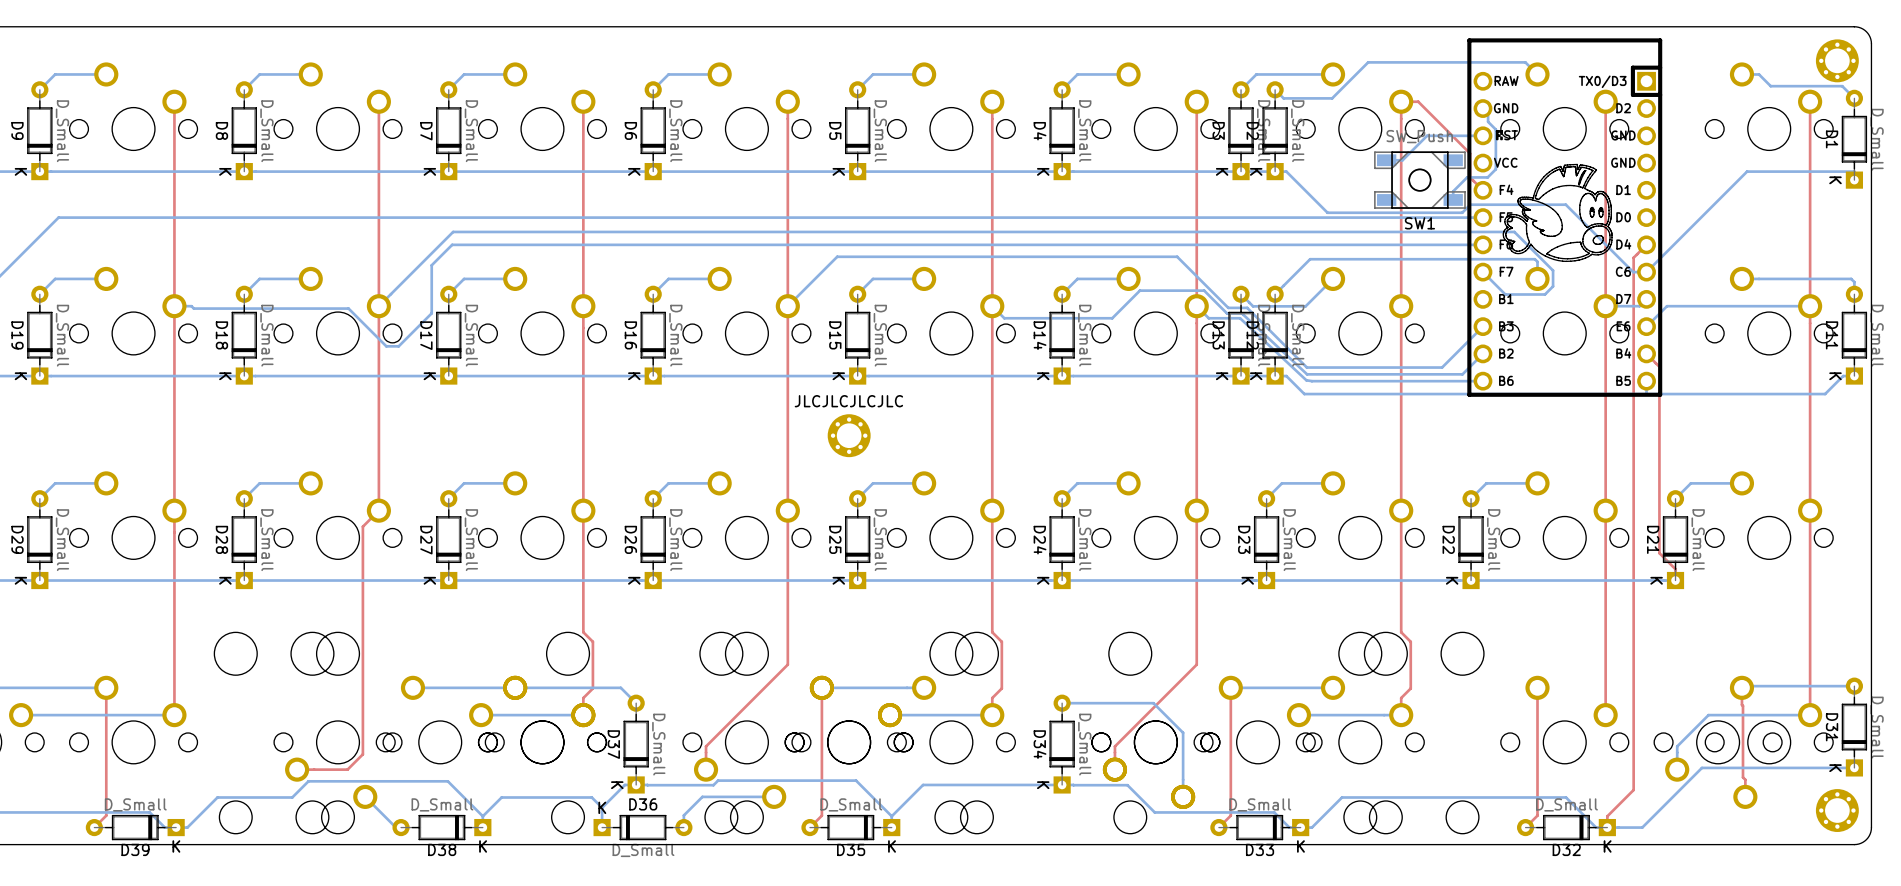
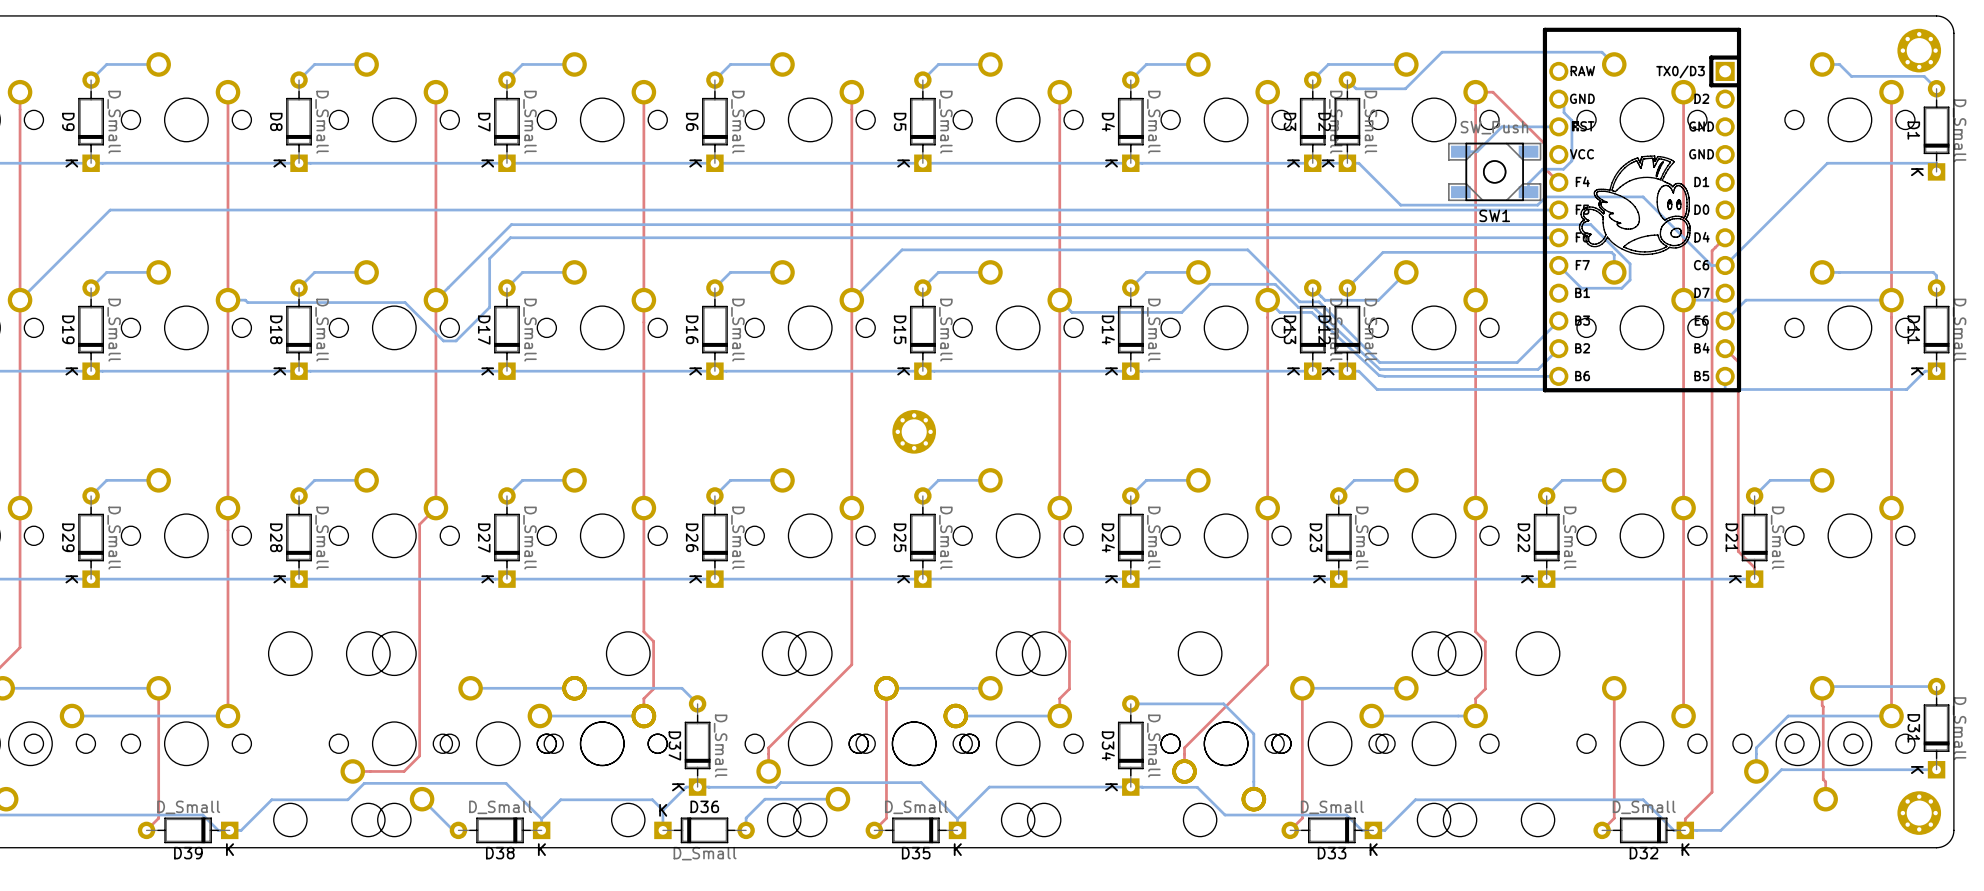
text: JLCJLCJLCJLC (848, 401) -> none

